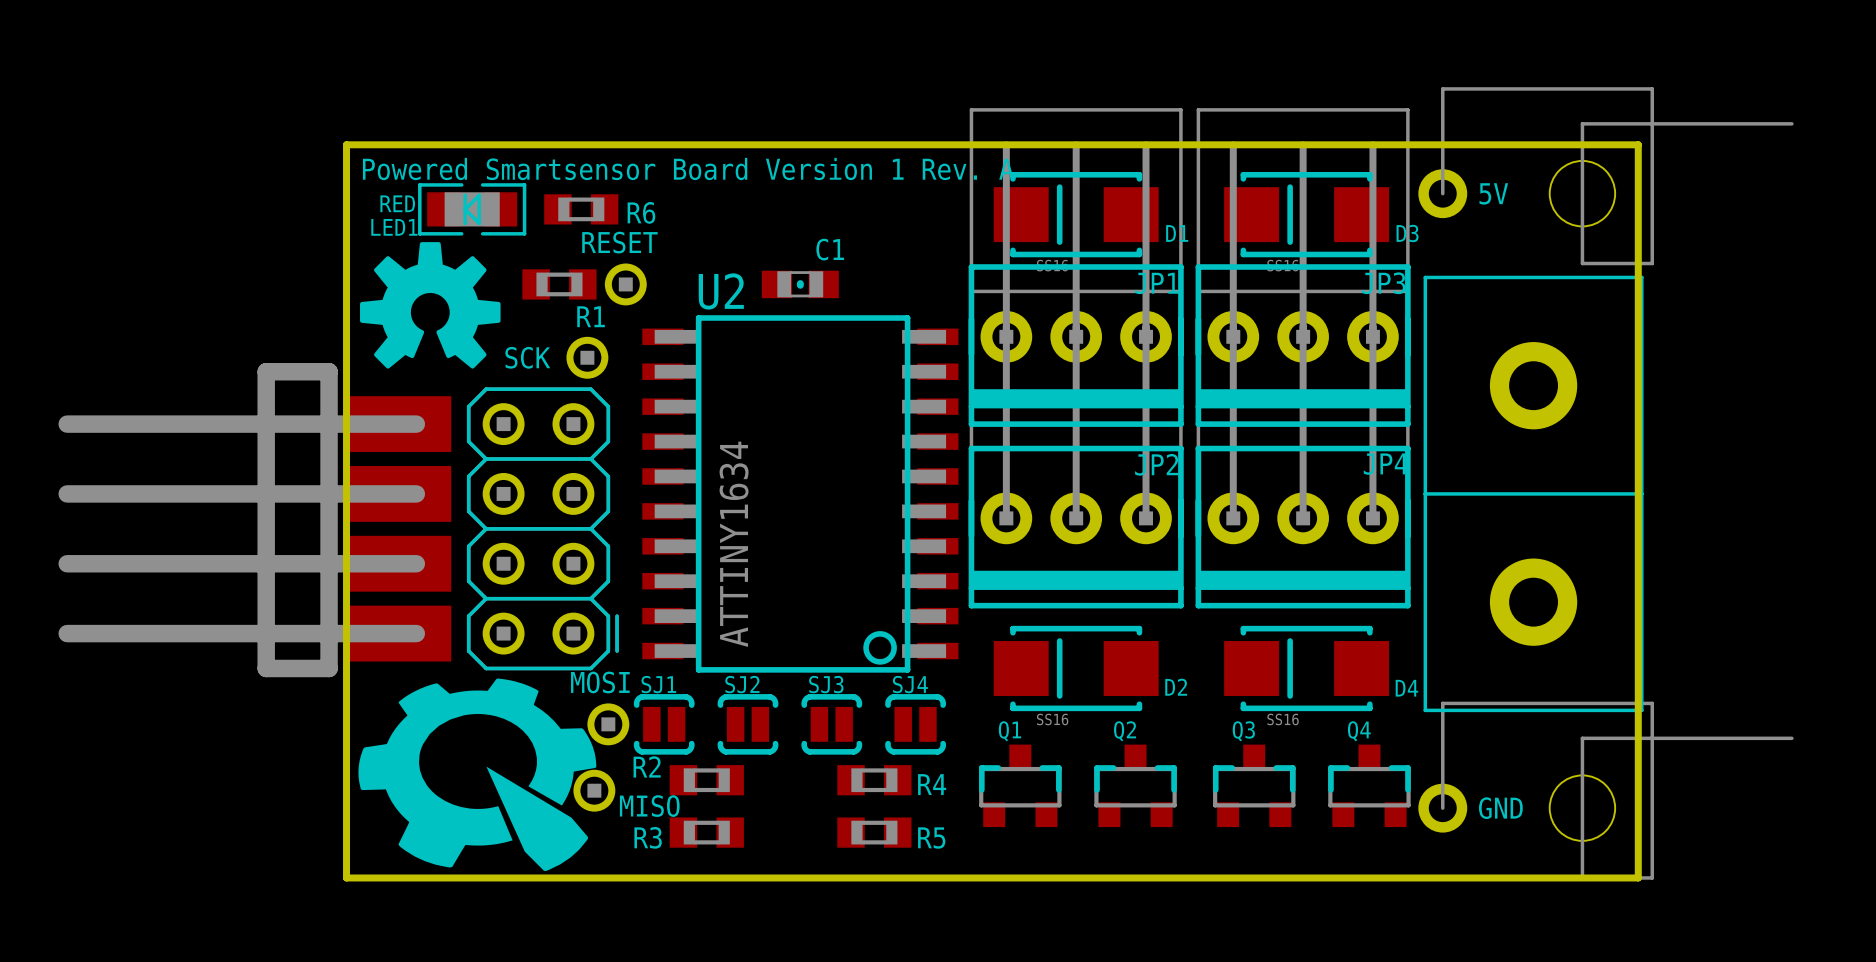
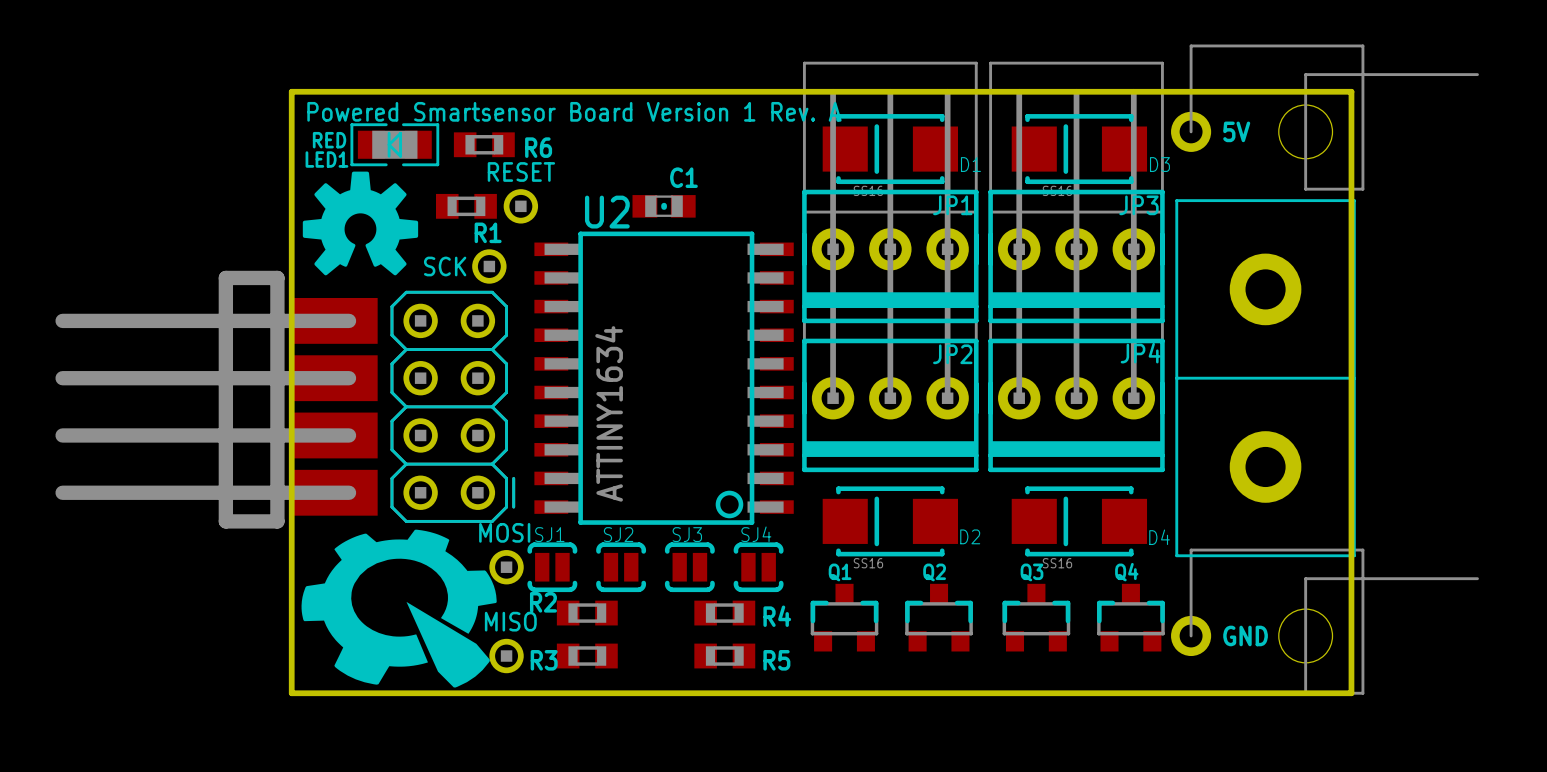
MISO position: (594, 790) -> (506, 656)
MISO name position: MISO (649, 806) -> MISO (510, 621)

